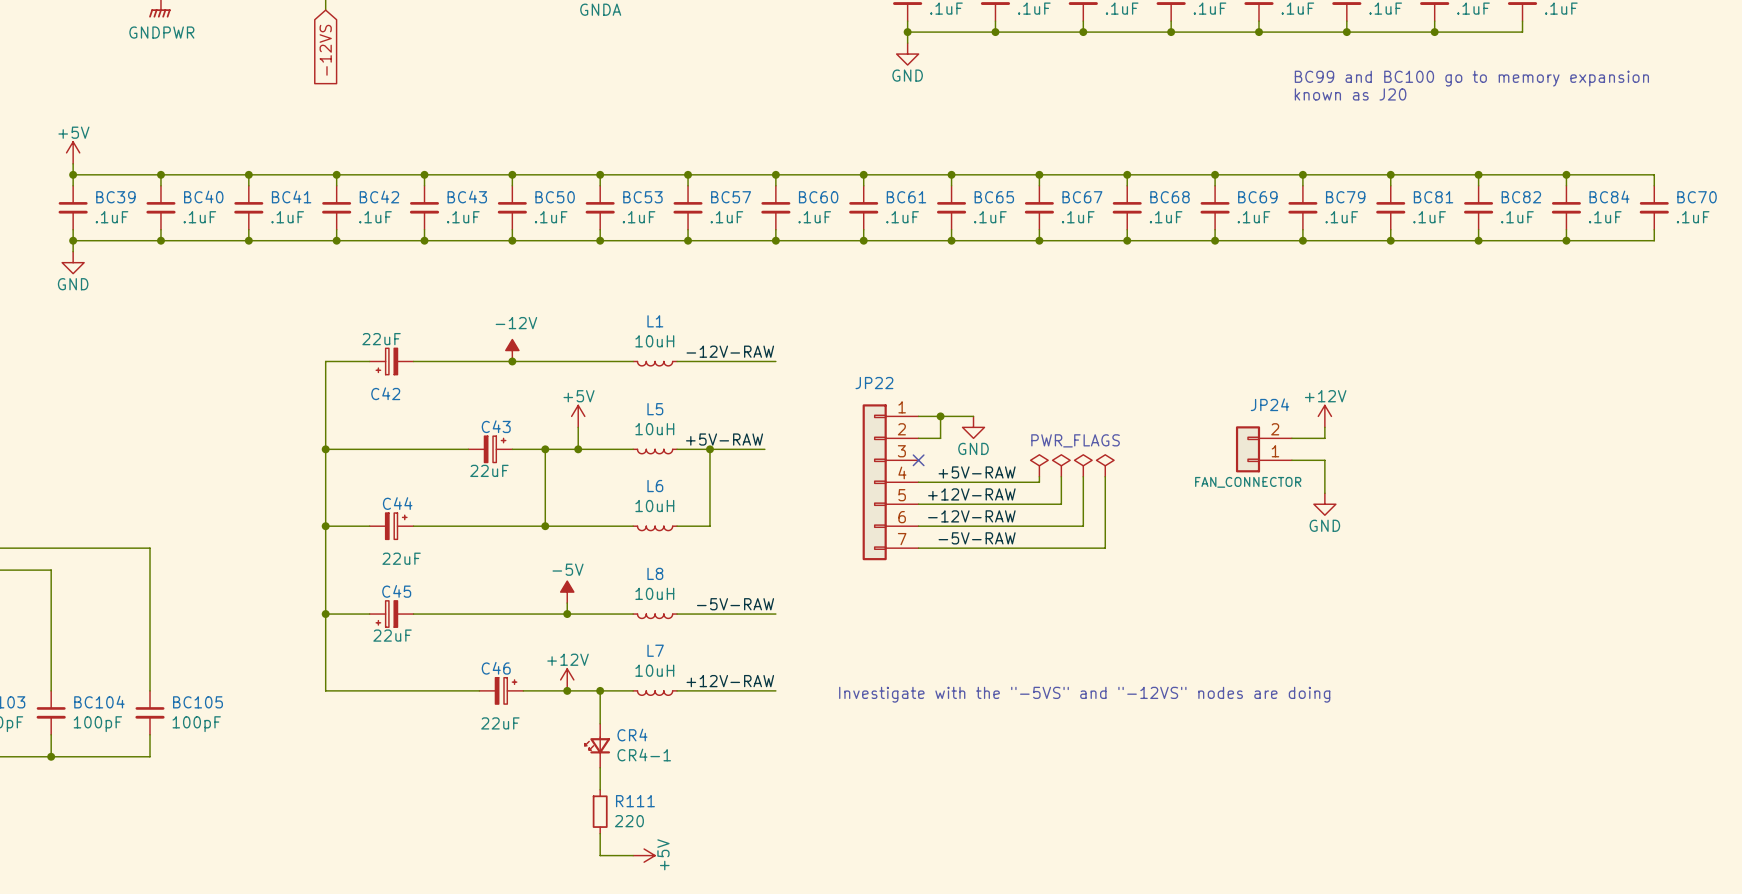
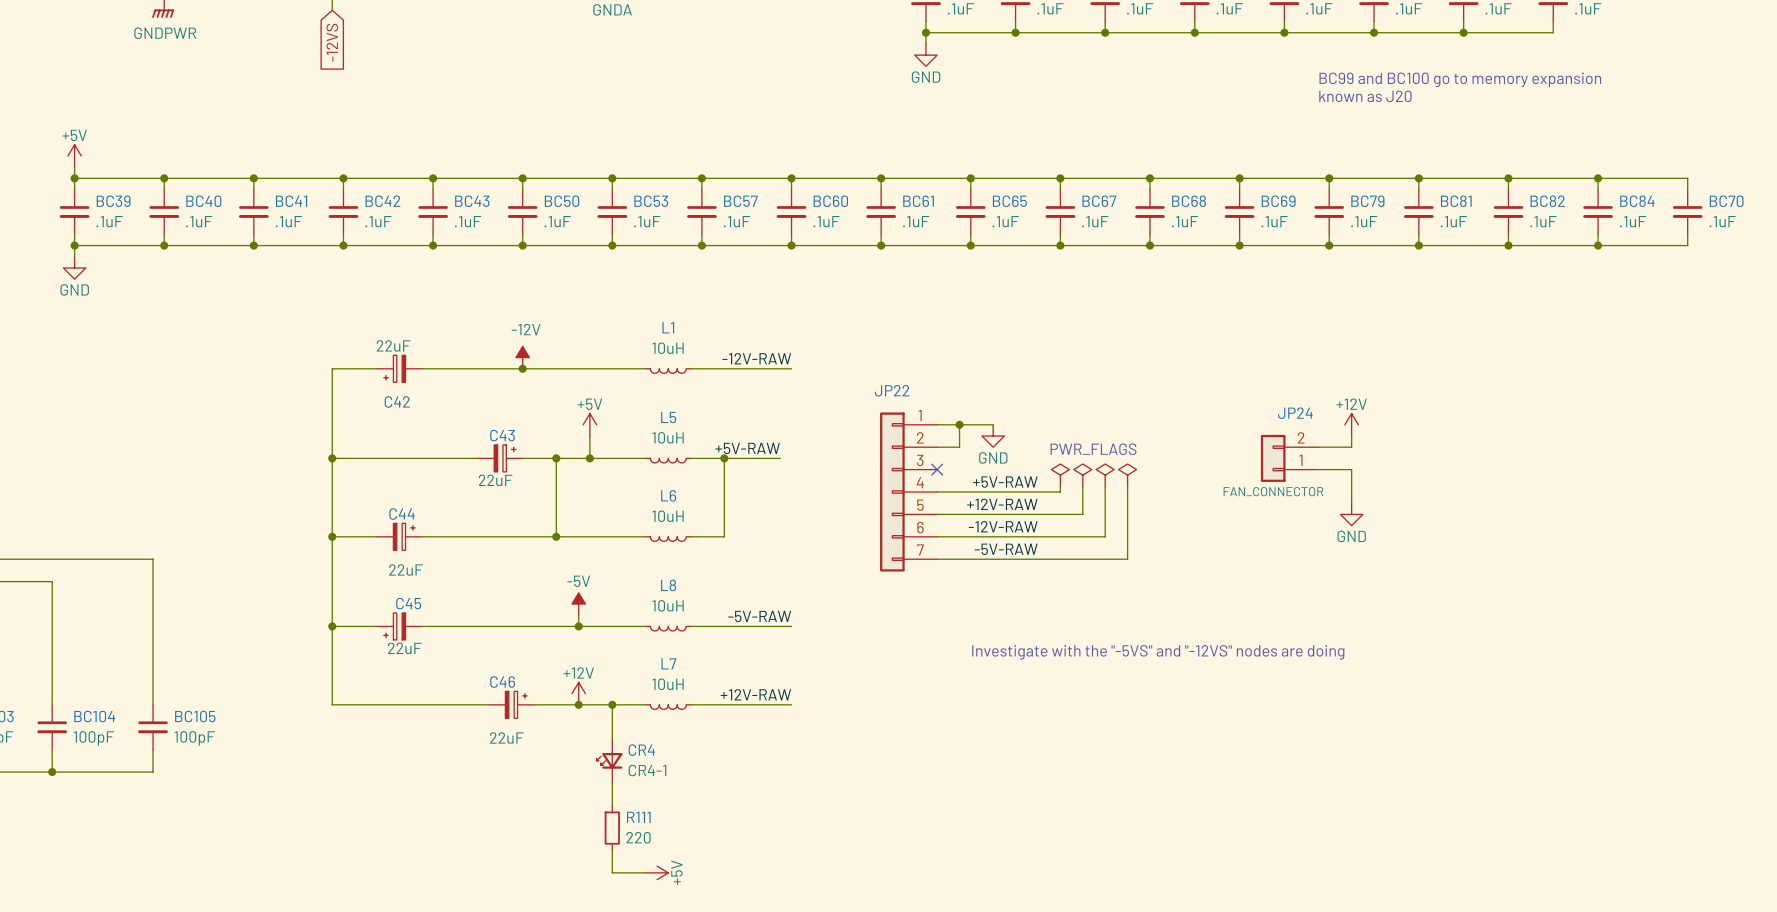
text position: Investigate with the "-5VS" and "-12VS" nodes are doing (1084, 694) -> Investigate with the "-5VS" and "-12VS" nodes are doing (1158, 652)

